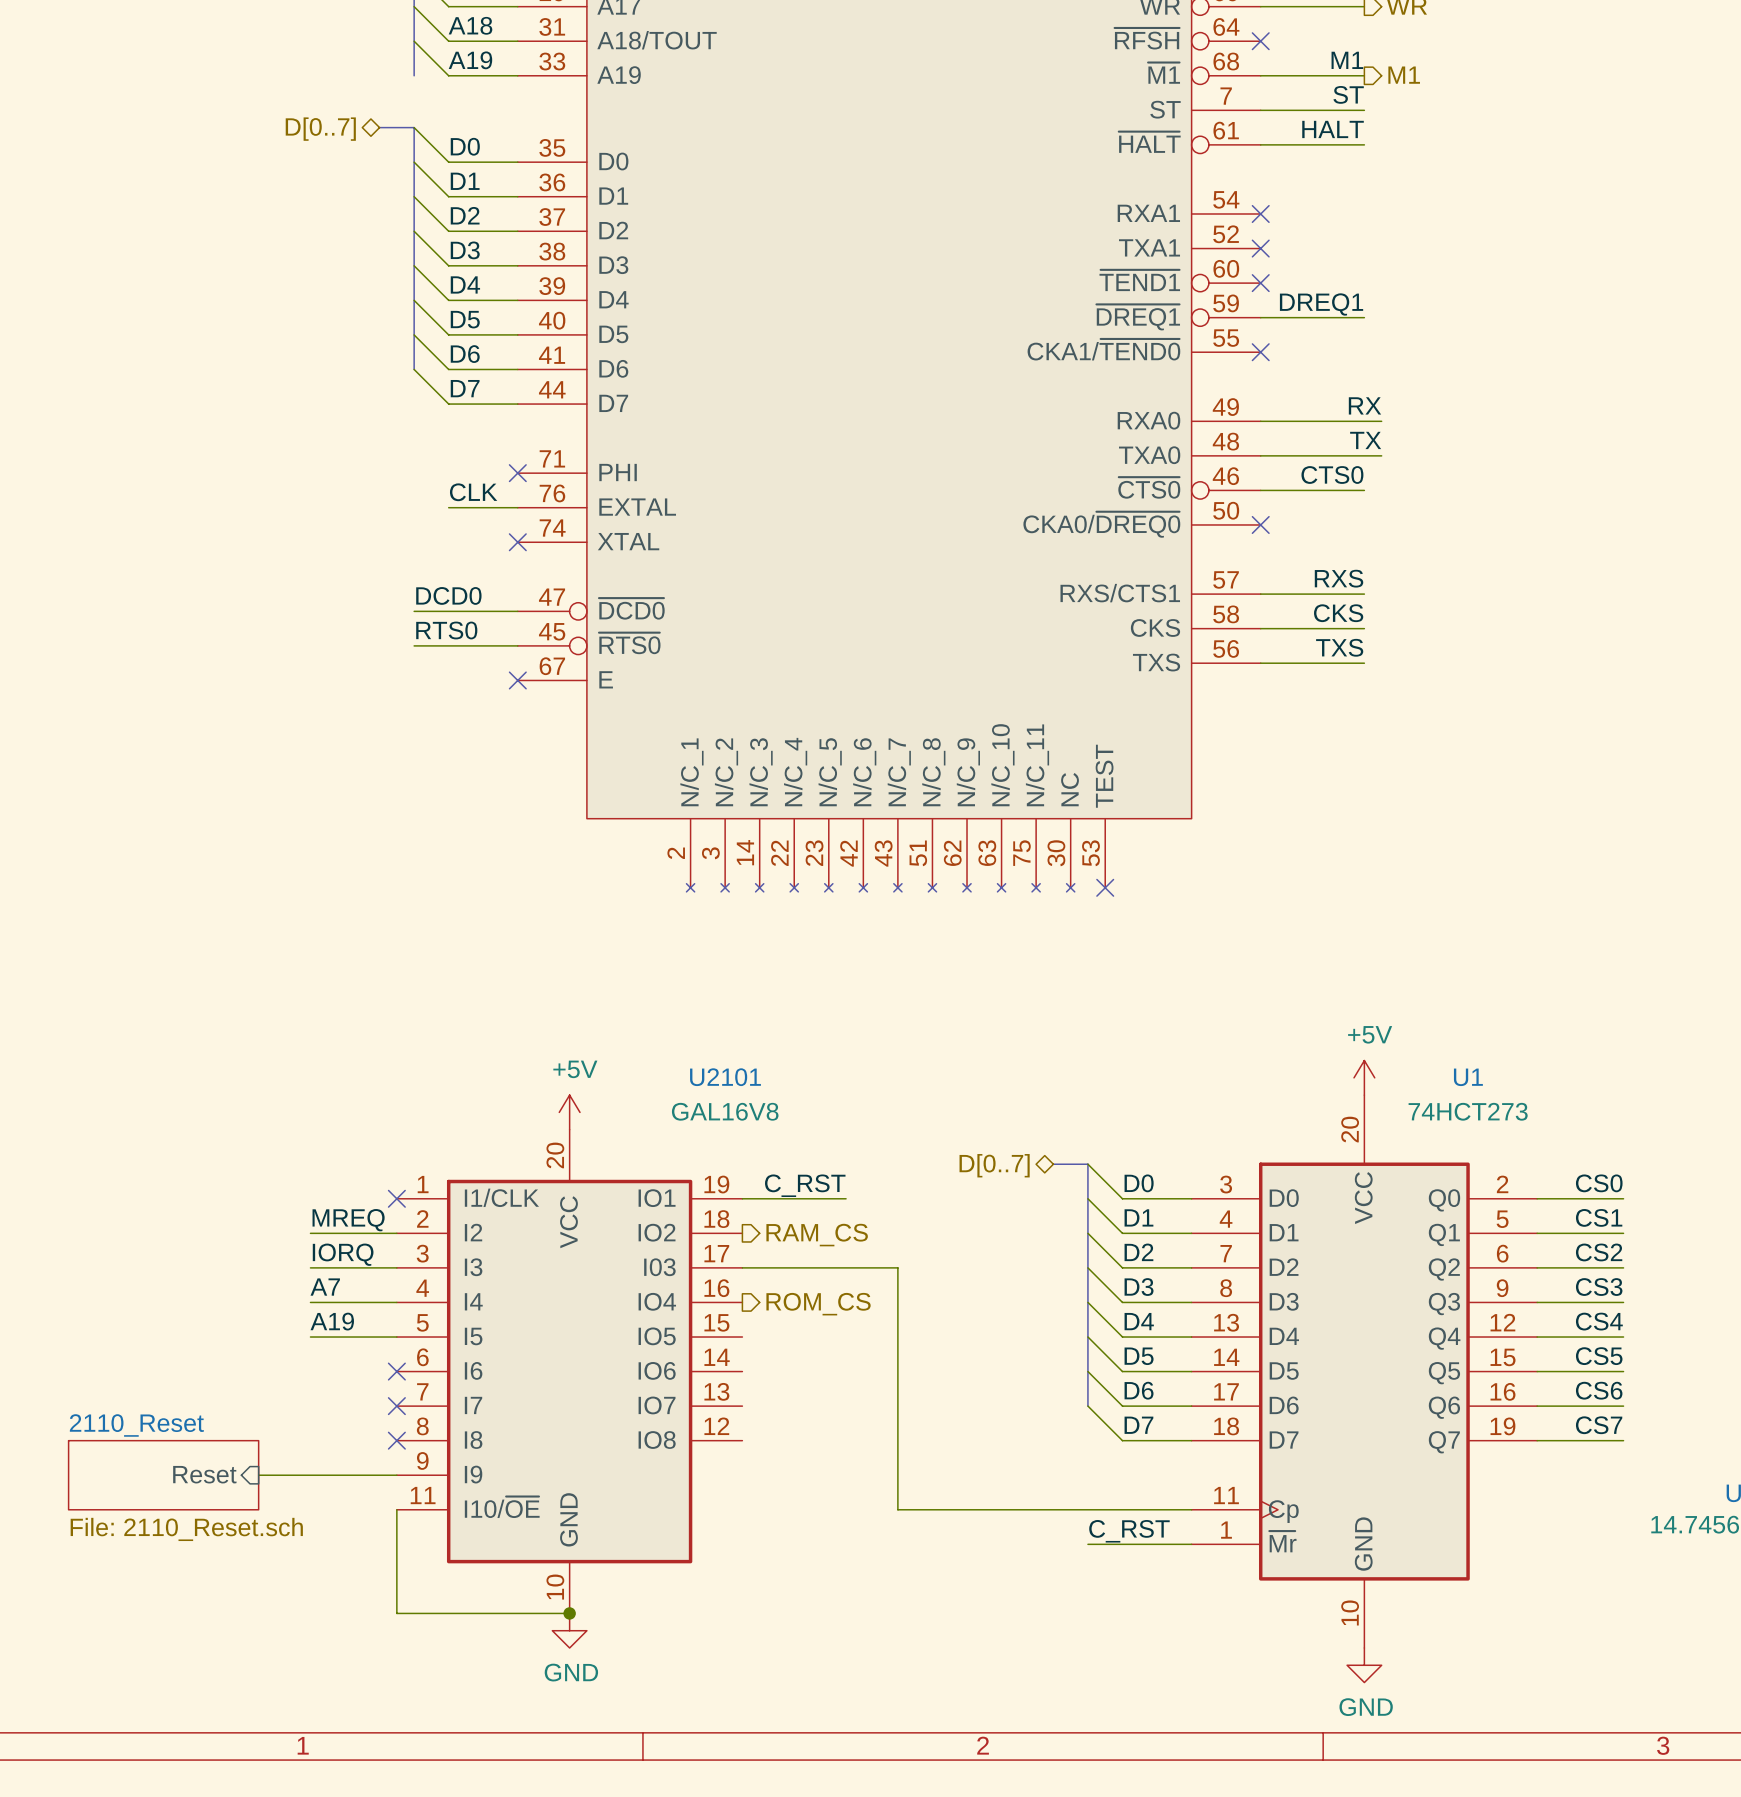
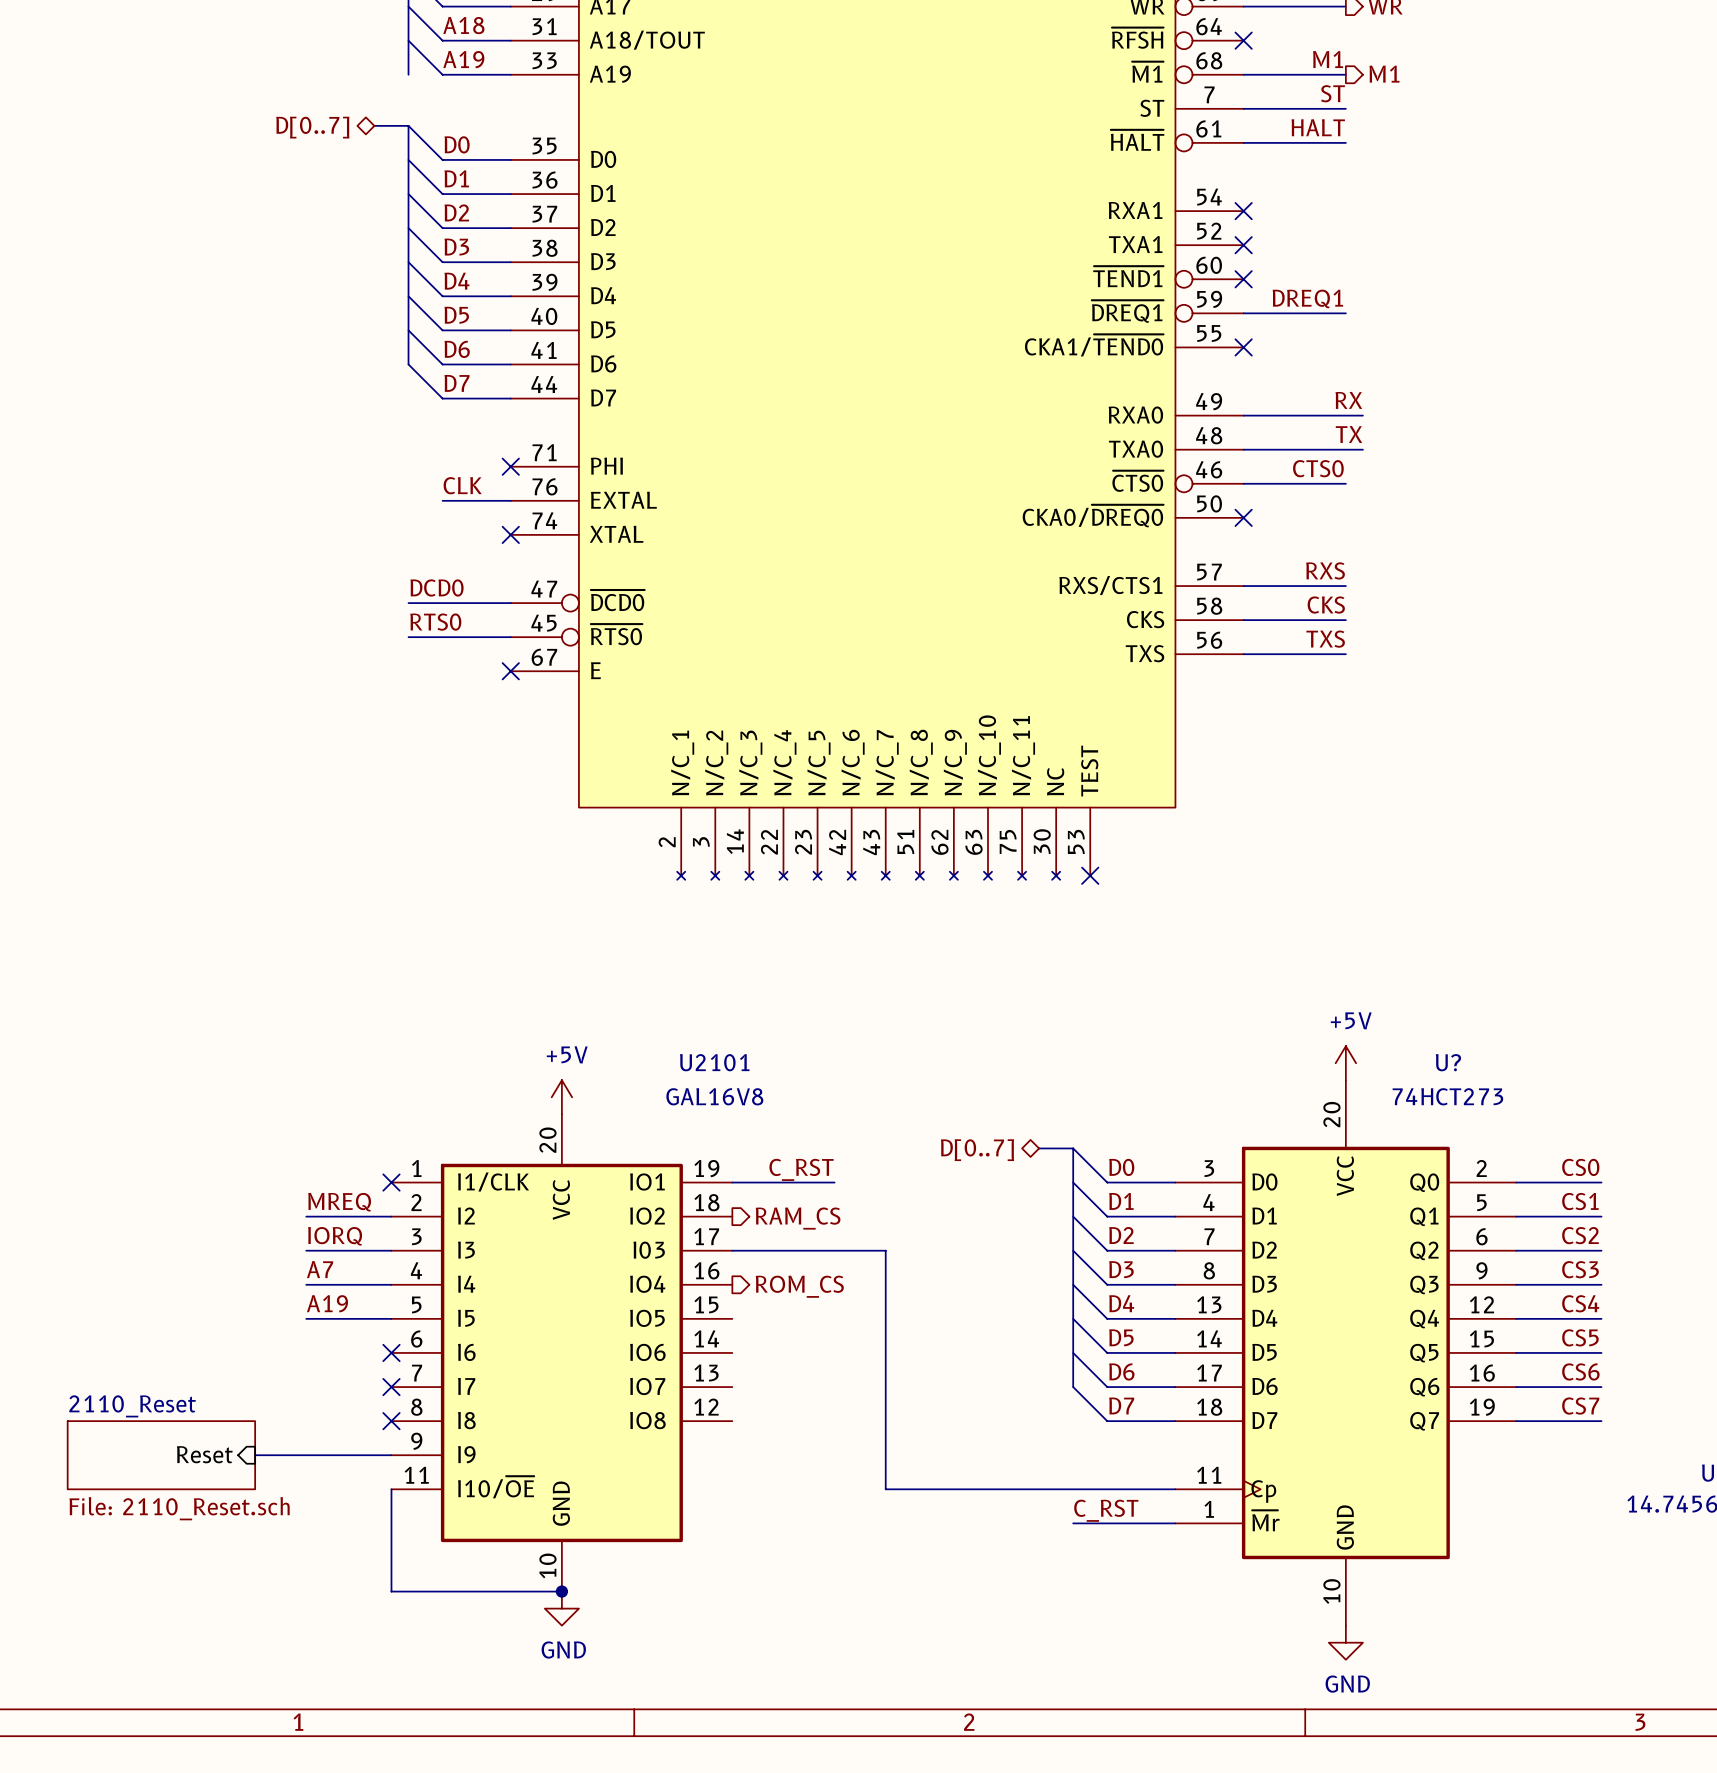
U1 name: U1 (1468, 1077) -> U? (1448, 1062)

